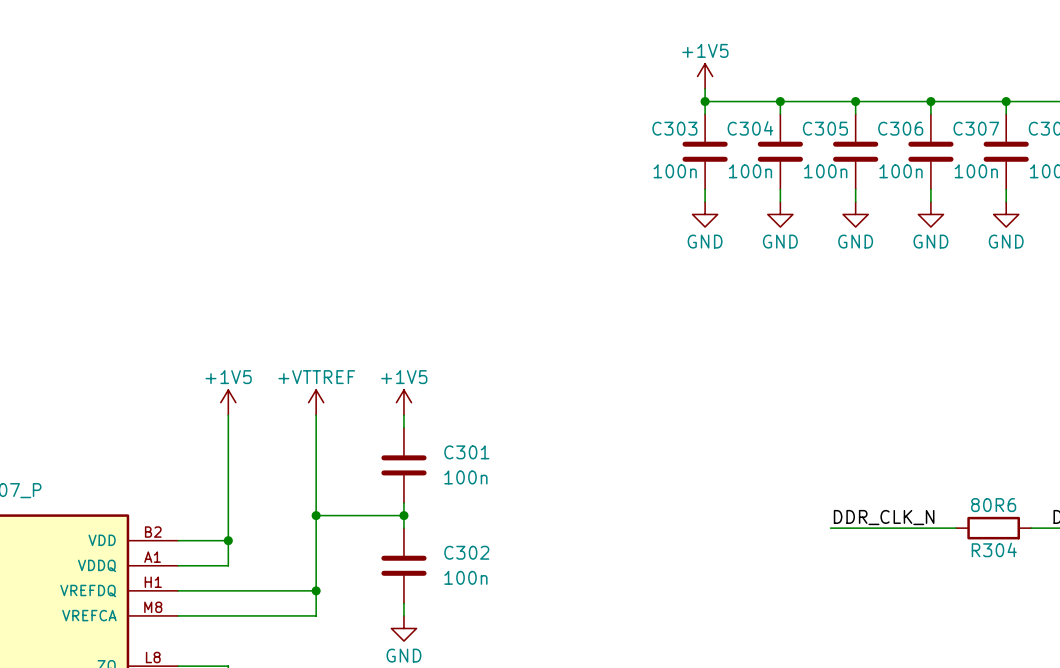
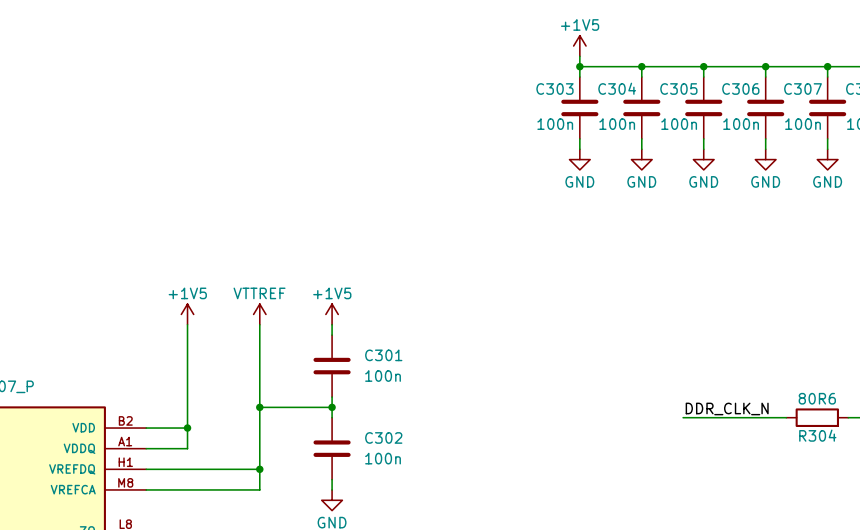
power symbol: +VTTREF (316, 402) -> VTTREF (259, 314)

